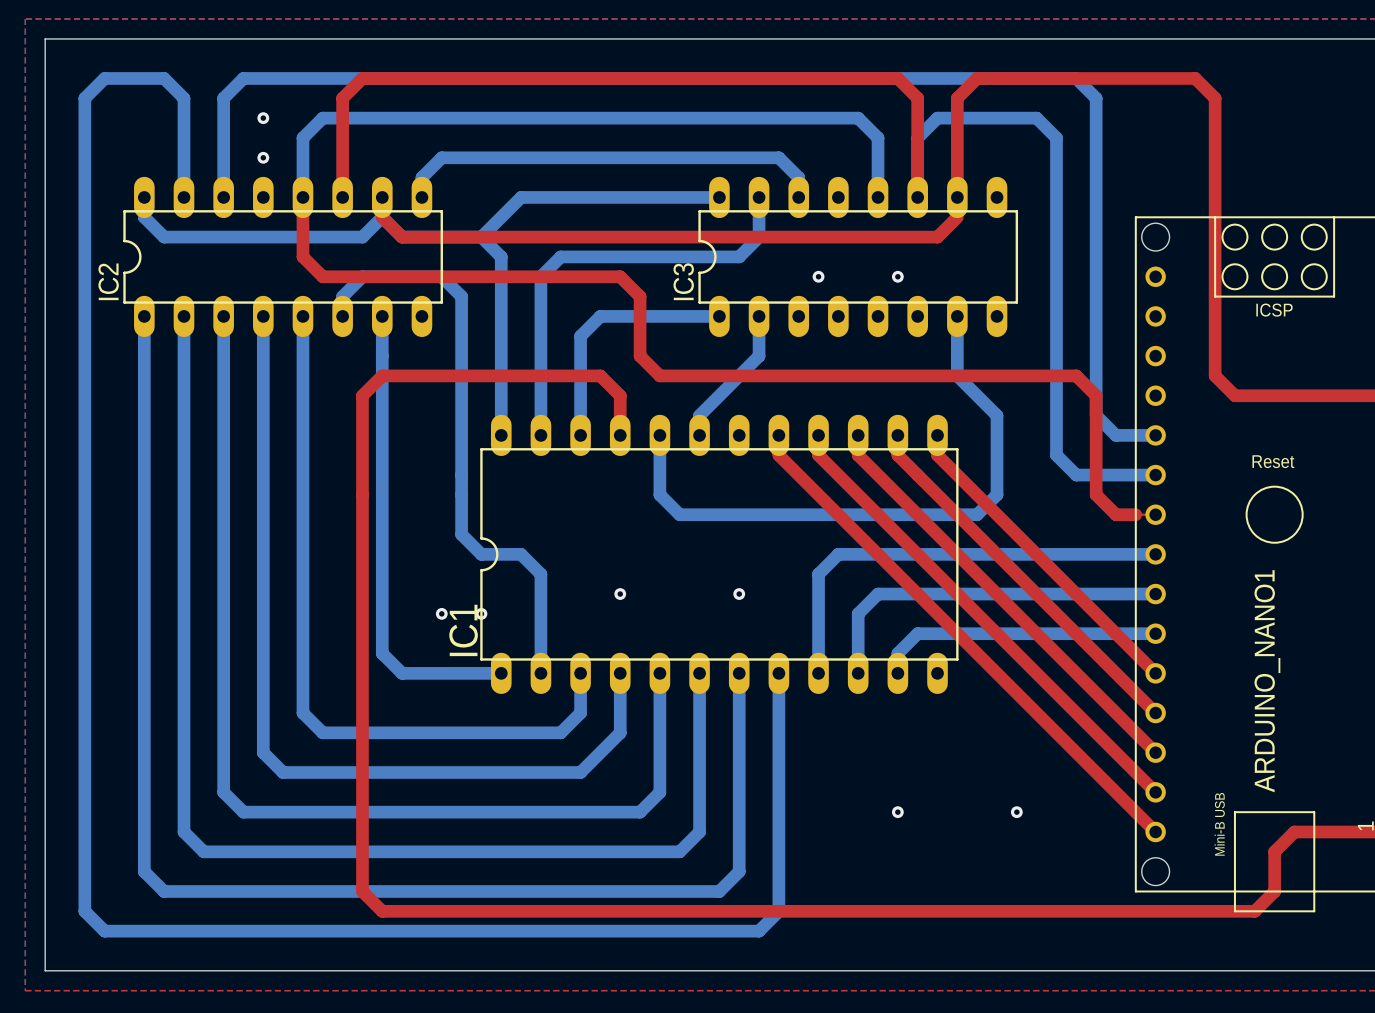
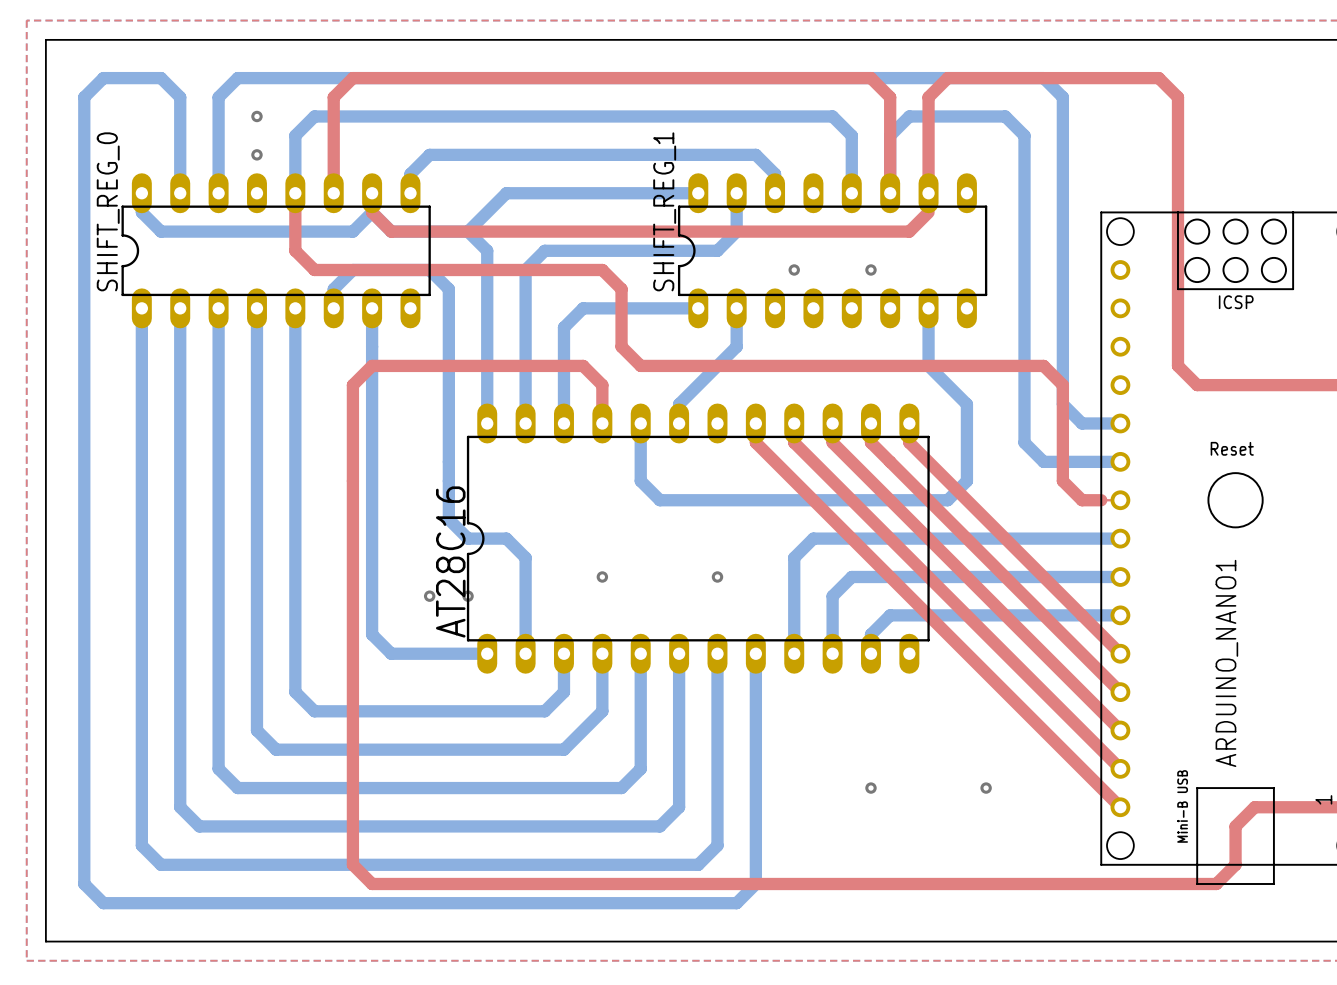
IC2 name: IC2 (108, 281) -> SHIFT_REG_0 (108, 211)
IC3 name: IC3 (683, 281) -> SHIFT_REG_1 (664, 211)
IC1 name: IC1 (463, 630) -> AT28C16 (450, 561)

